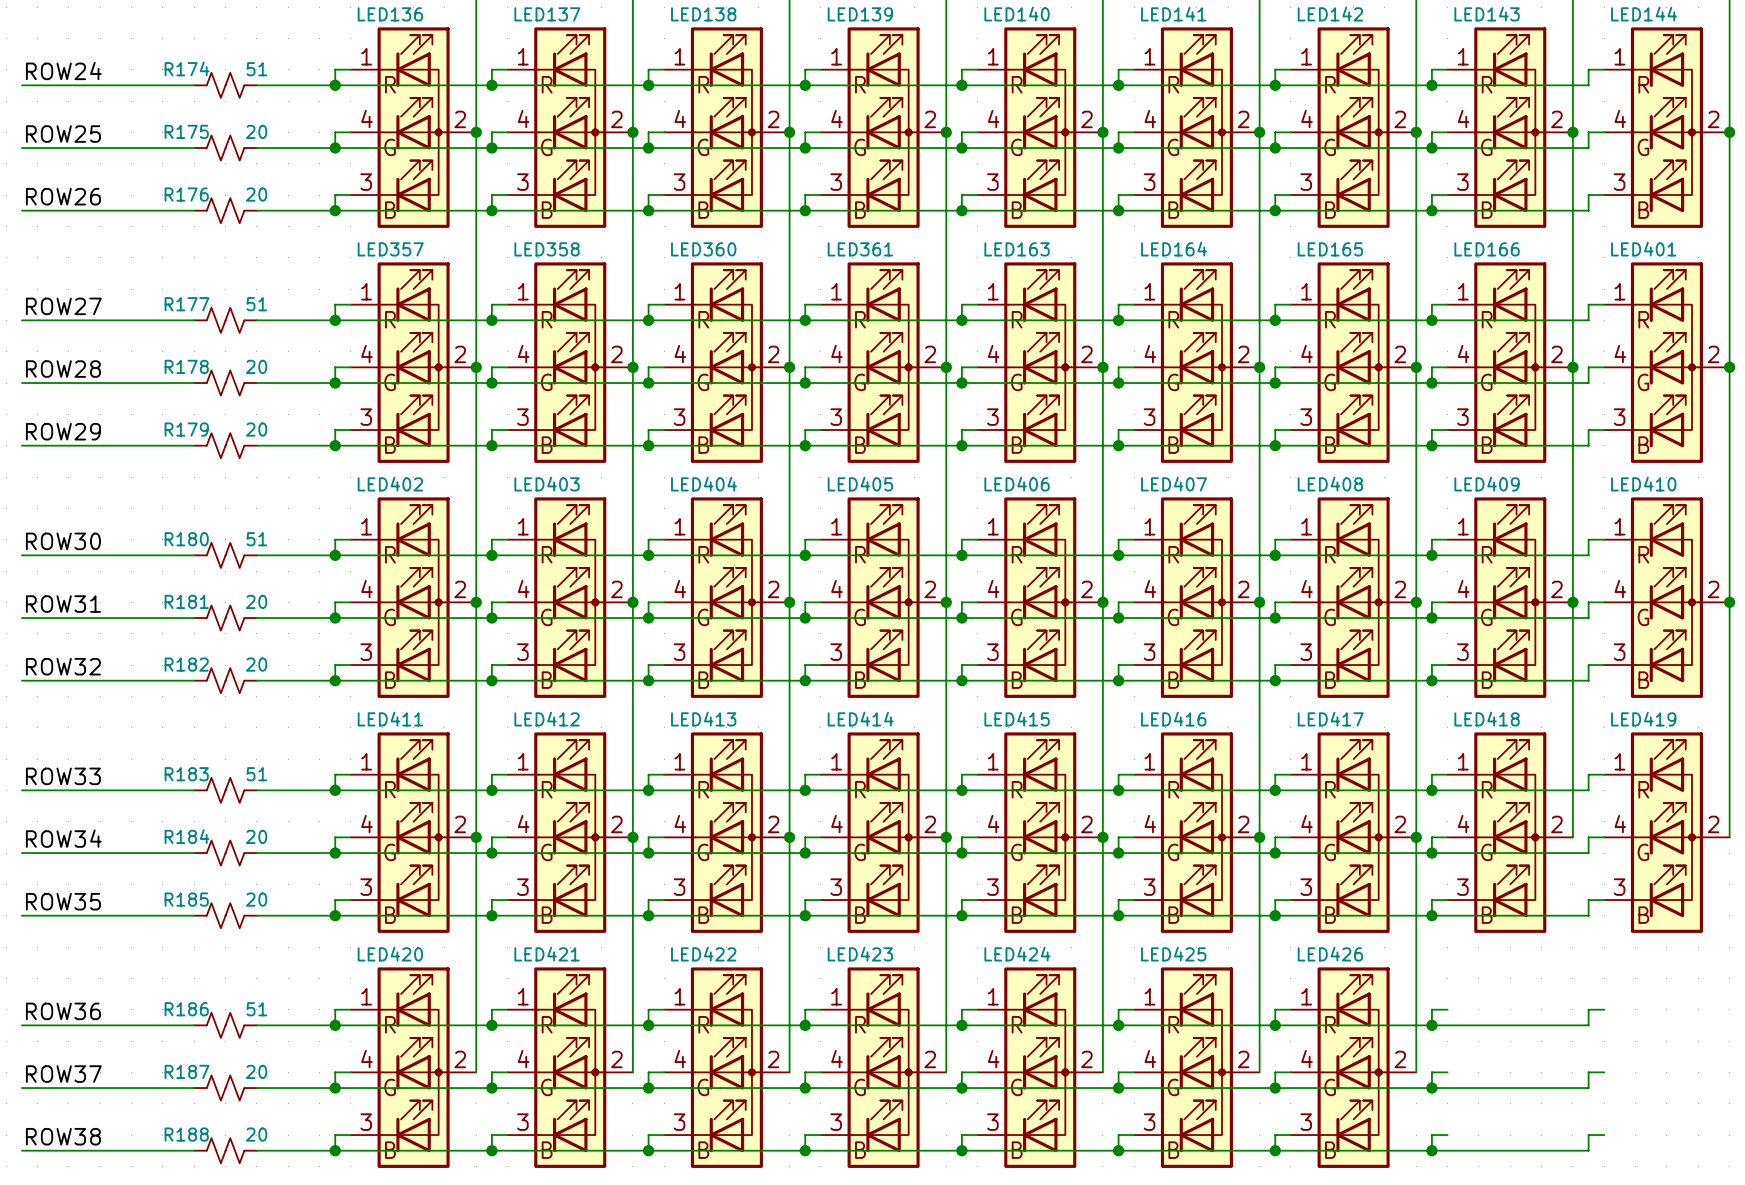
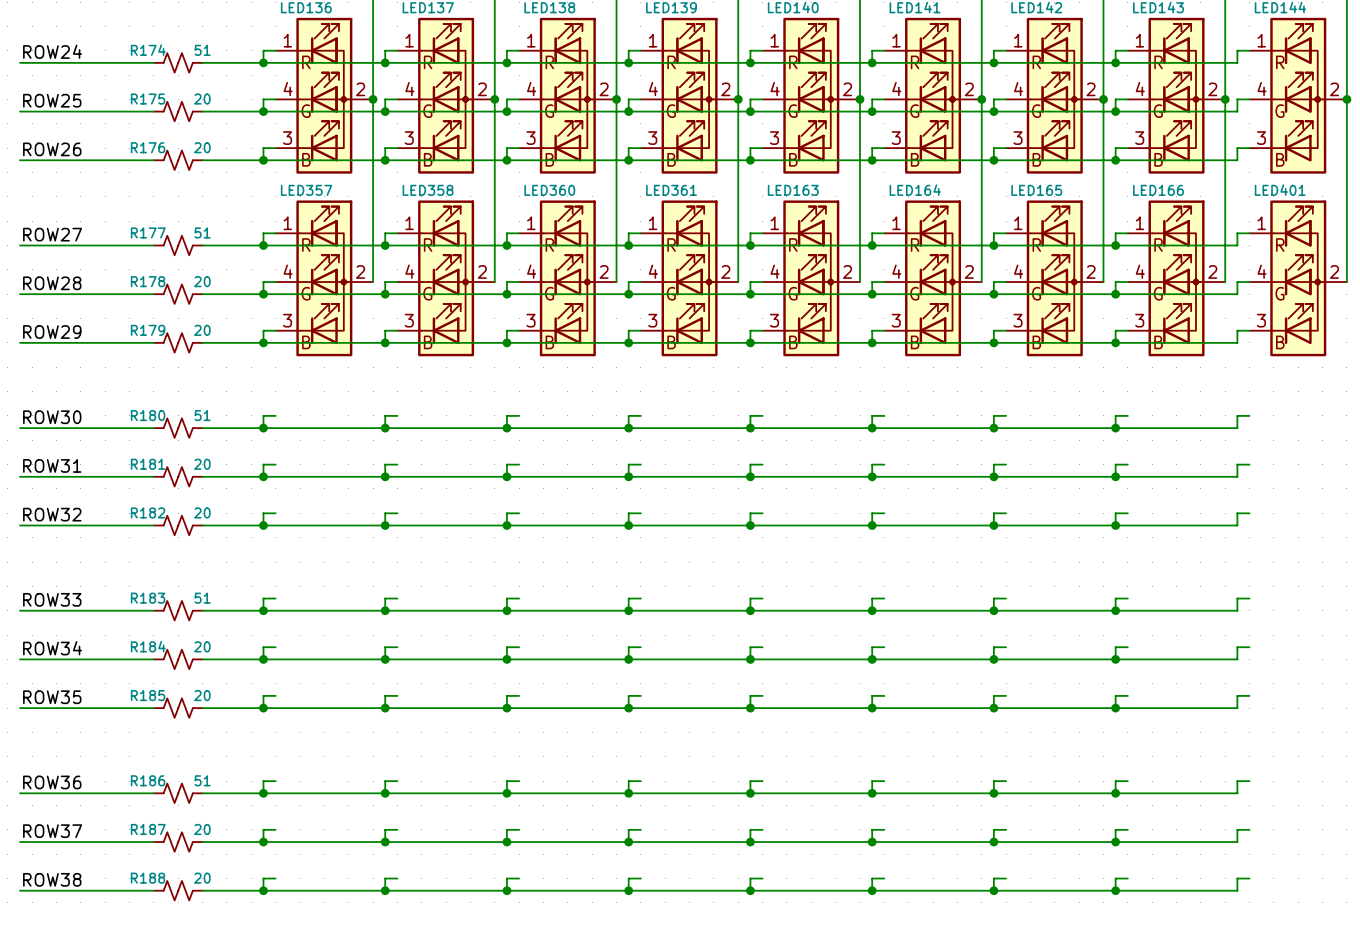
wire: (476, 367) (476, 1072) -> none
junction: (476, 367) -> none
wire: (632, 367) (632, 1072) -> none
junction: (632, 367) -> none
wire: (789, 367) (789, 1072) -> none
junction: (789, 367) -> none
wire: (946, 367) (946, 1072) -> none
junction: (946, 367) -> none
wire: (1102, 367) (1102, 1072) -> none
junction: (1102, 367) -> none
wire: (1259, 367) (1259, 1072) -> none
junction: (1259, 367) -> none
wire: (1416, 367) (1416, 1072) -> none
junction: (1416, 367) -> none
wire: (1572, 367) (1572, 837) -> none
junction: (1572, 367) -> none
wire: (1729, 367) (1729, 837) -> none
junction: (1729, 367) -> none
LED402: (413, 597) -> none
LED403: (570, 597) -> none
LED404: (726, 597) -> none
LED405: (883, 597) -> none
LED406: (1040, 597) -> none
LED407: (1196, 597) -> none
LED408: (1353, 597) -> none
LED409: (1510, 597) -> none
LED410: (1666, 597) -> none
junction: (476, 602) -> none
junction: (632, 602) -> none
junction: (789, 602) -> none
junction: (946, 602) -> none
junction: (1102, 602) -> none
junction: (1259, 602) -> none
junction: (1416, 602) -> none
junction: (1572, 602) -> none
junction: (1729, 602) -> none
LED411: (413, 832) -> none
LED412: (570, 832) -> none
LED413: (726, 832) -> none
LED414: (883, 832) -> none
LED415: (1040, 832) -> none
LED416: (1196, 832) -> none
LED417: (1353, 832) -> none
LED418: (1510, 832) -> none
LED419: (1666, 832) -> none
junction: (476, 837) -> none
junction: (632, 837) -> none
junction: (789, 837) -> none
junction: (946, 837) -> none
junction: (1102, 837) -> none
junction: (1259, 837) -> none
junction: (1416, 837) -> none
LED420: (413, 1067) -> none
LED421: (570, 1067) -> none
LED422: (726, 1067) -> none
LED423: (883, 1067) -> none
LED424: (1040, 1067) -> none
LED425: (1196, 1067) -> none
LED426: (1353, 1067) -> none

